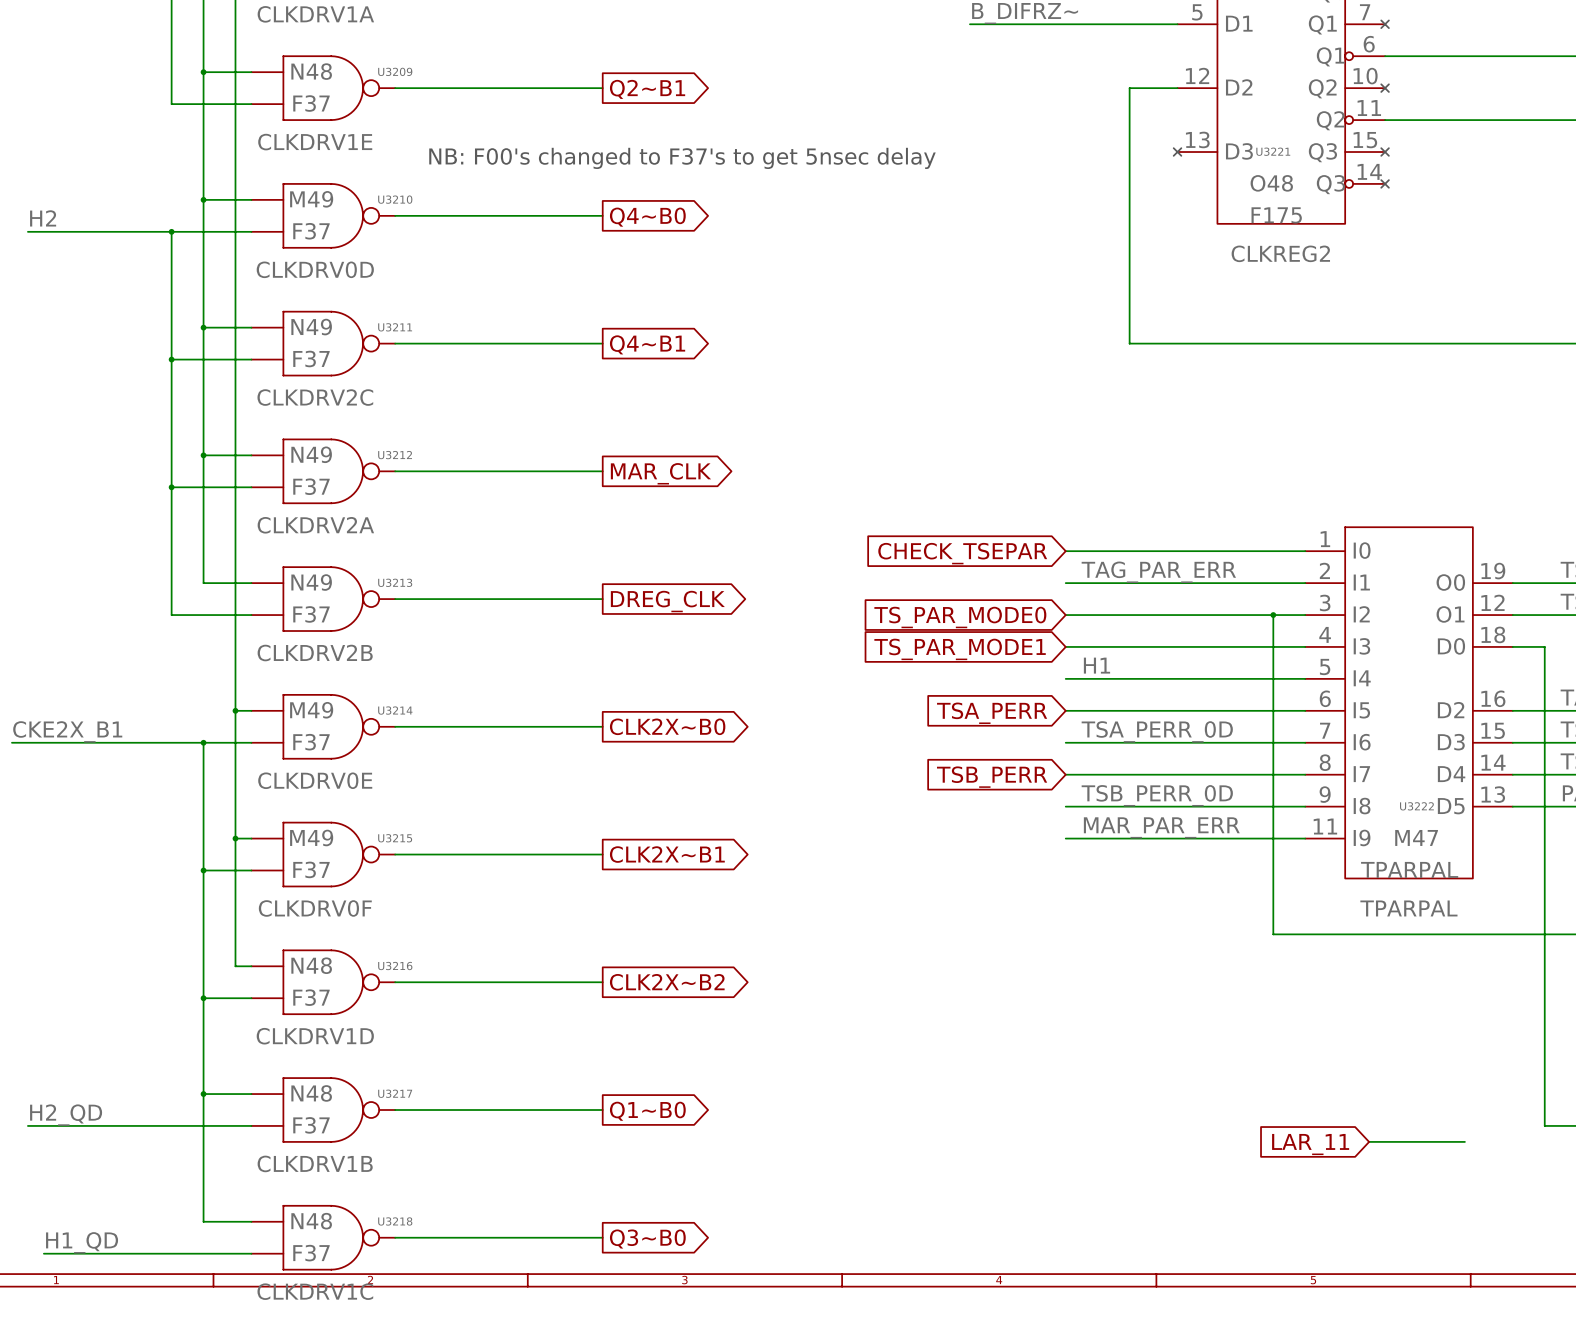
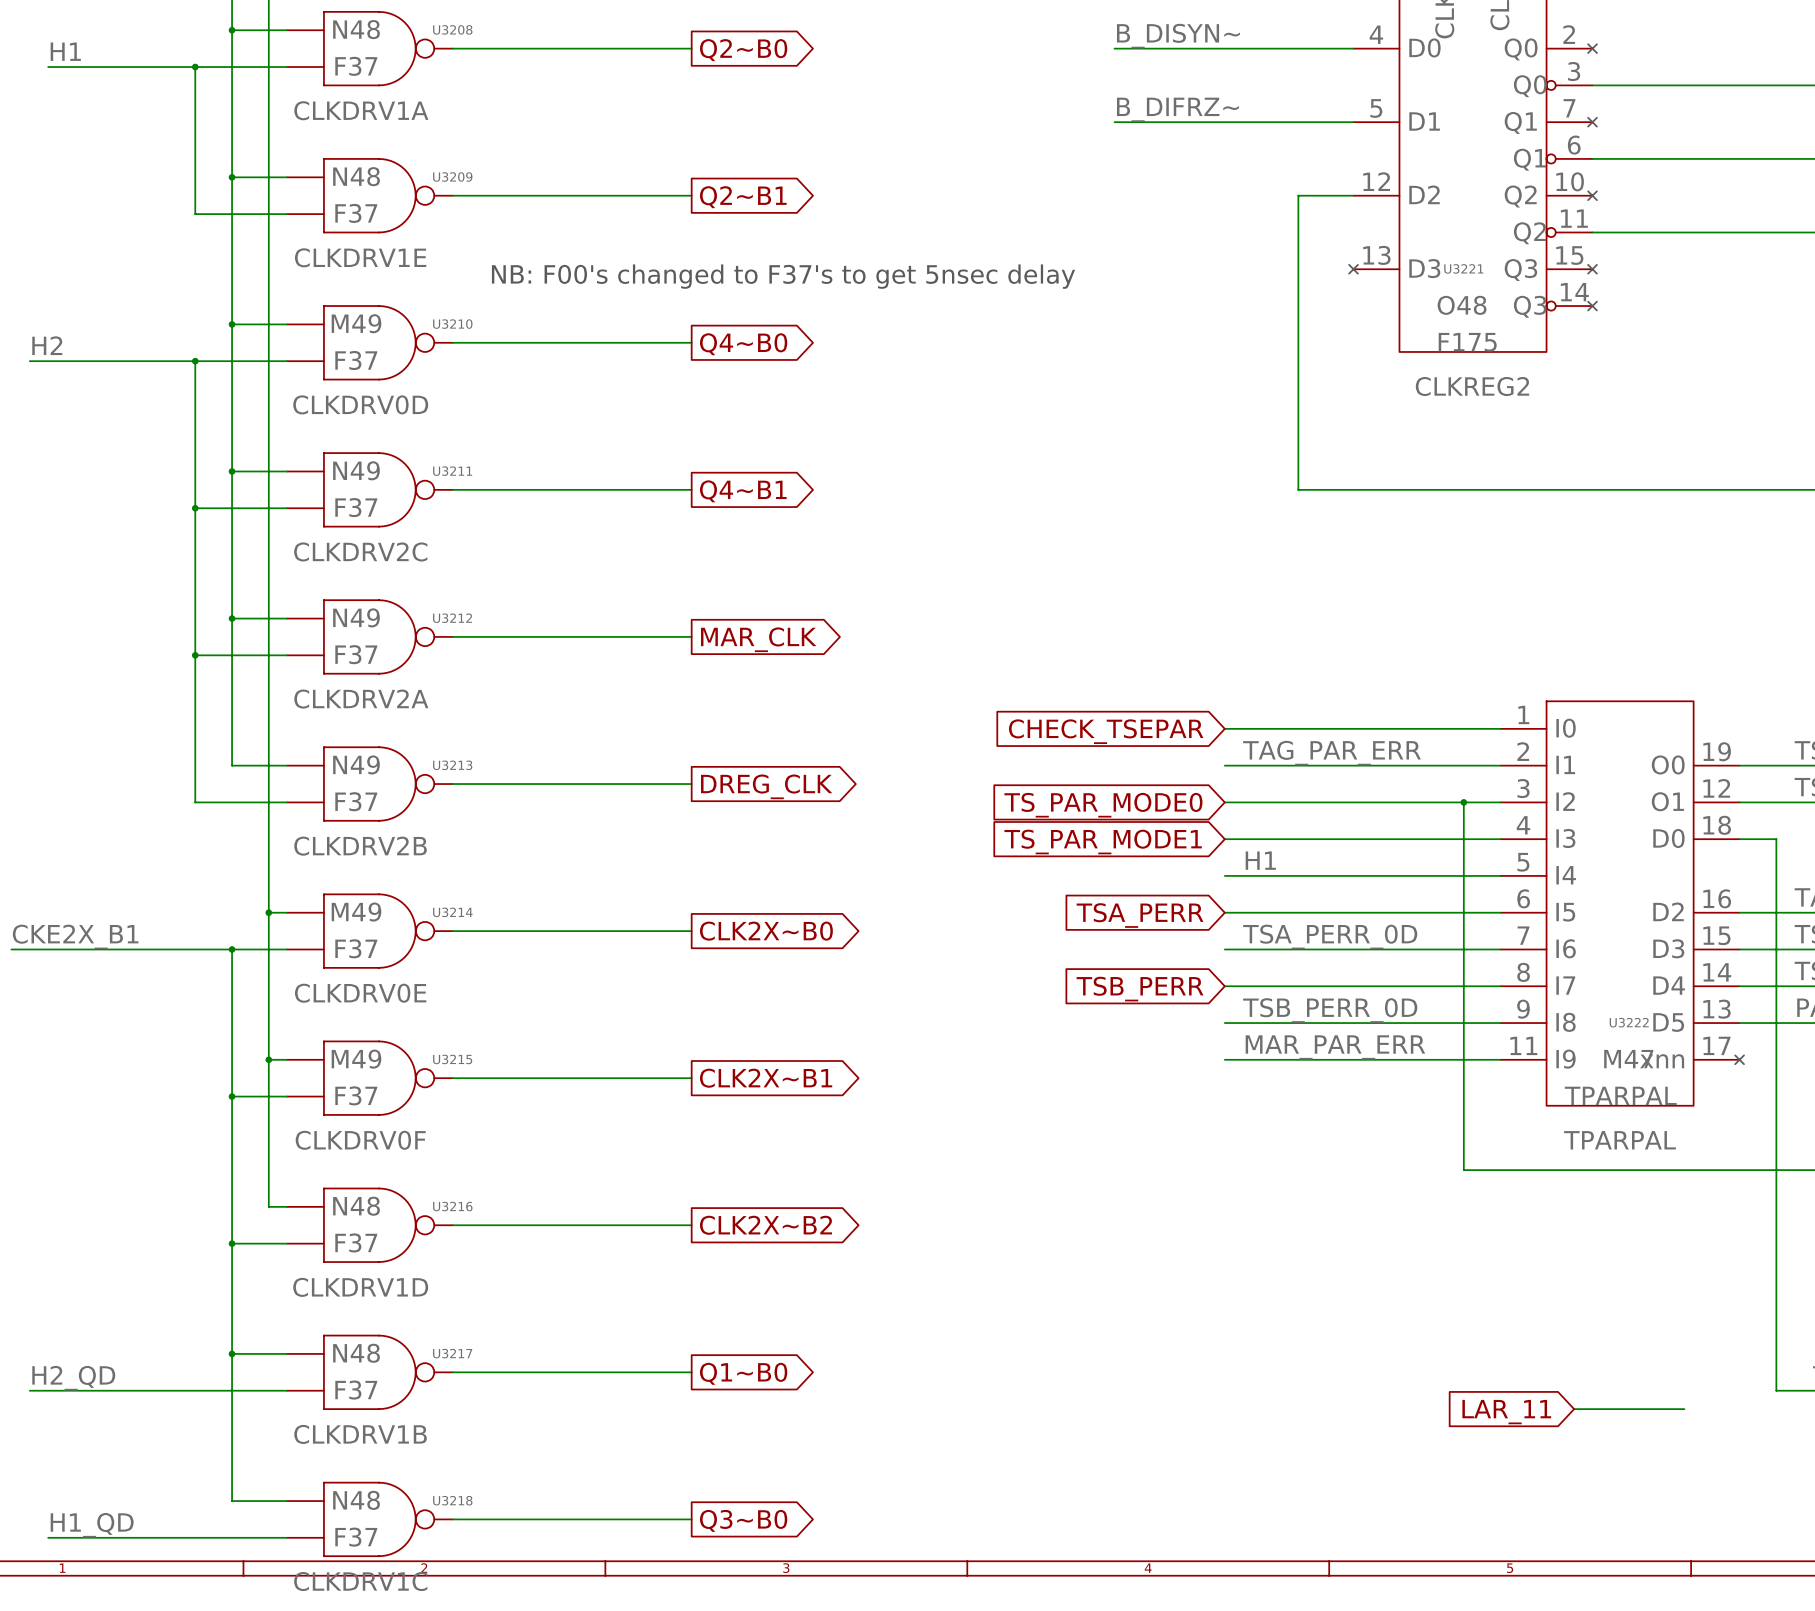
U3222 symbol: [1305, 527, 1513, 879] -> [1500, 701, 1740, 1106]
no-connect mark: none -> (1739, 1059)

